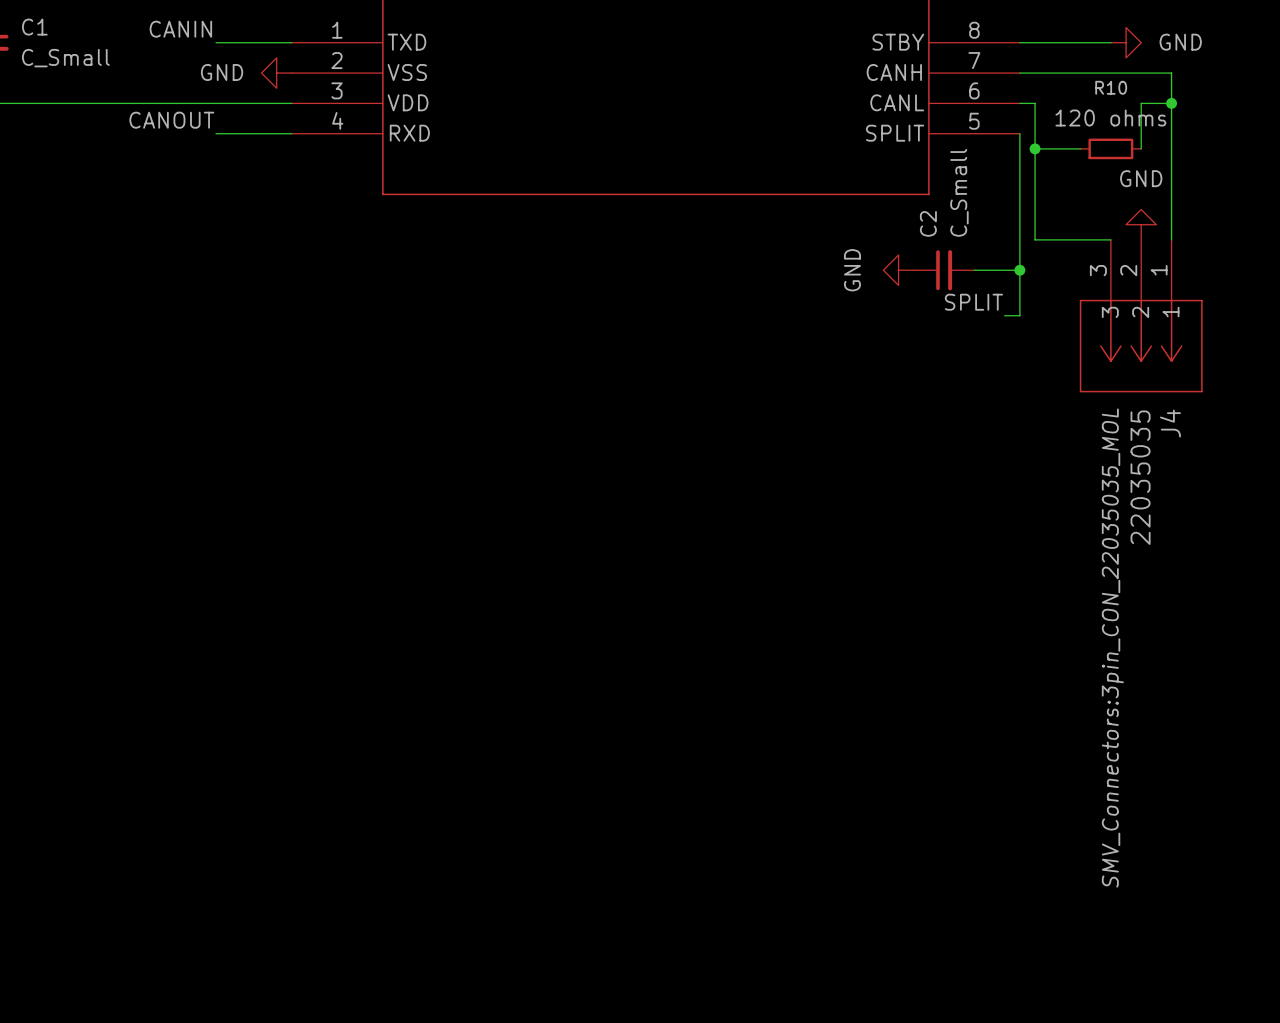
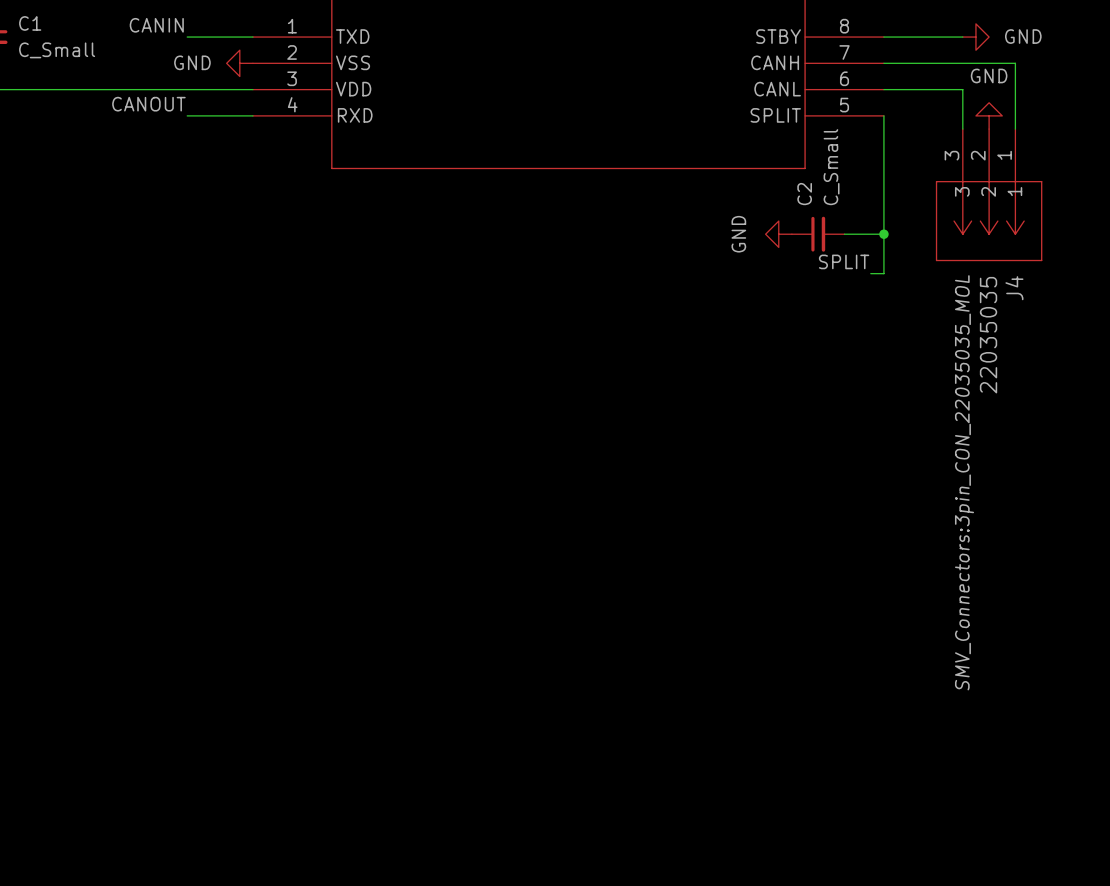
wire: (1035, 103) (1035, 239) (1110, 239) -> (897, 89) (962, 89) (962, 129)
wire: (1171, 103) (1141, 103) (1141, 148) -> none
junction: (1171, 103) -> none
wire: (1035, 148) (1080, 148) -> none
junction: (1035, 148) -> none
R10: 120 ohms (1110, 148) -> none
power symbol position: GND (1141, 224) -> GND (989, 115)
J4 position: (1141, 316) -> (989, 195)

